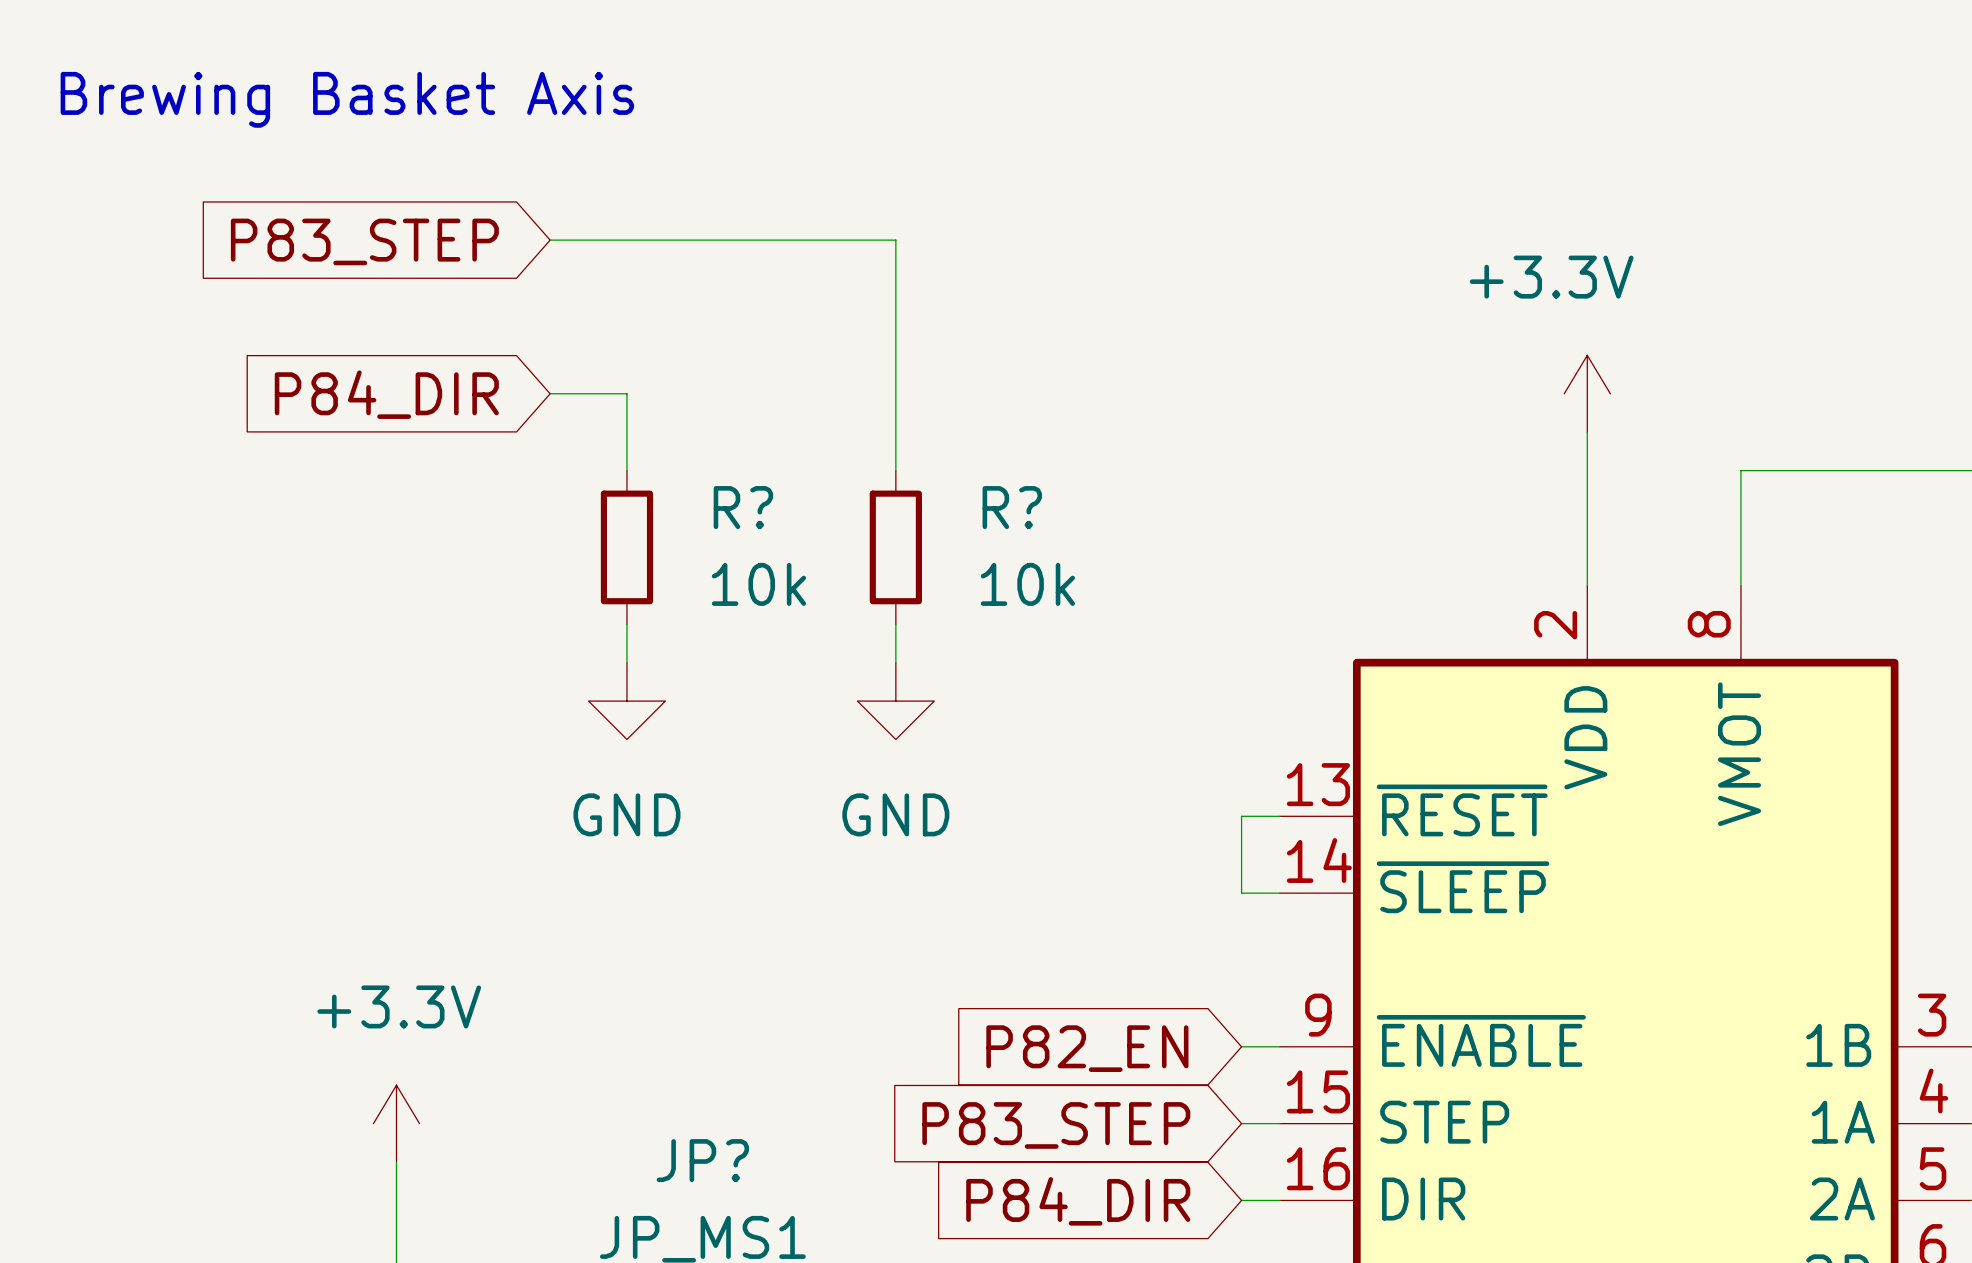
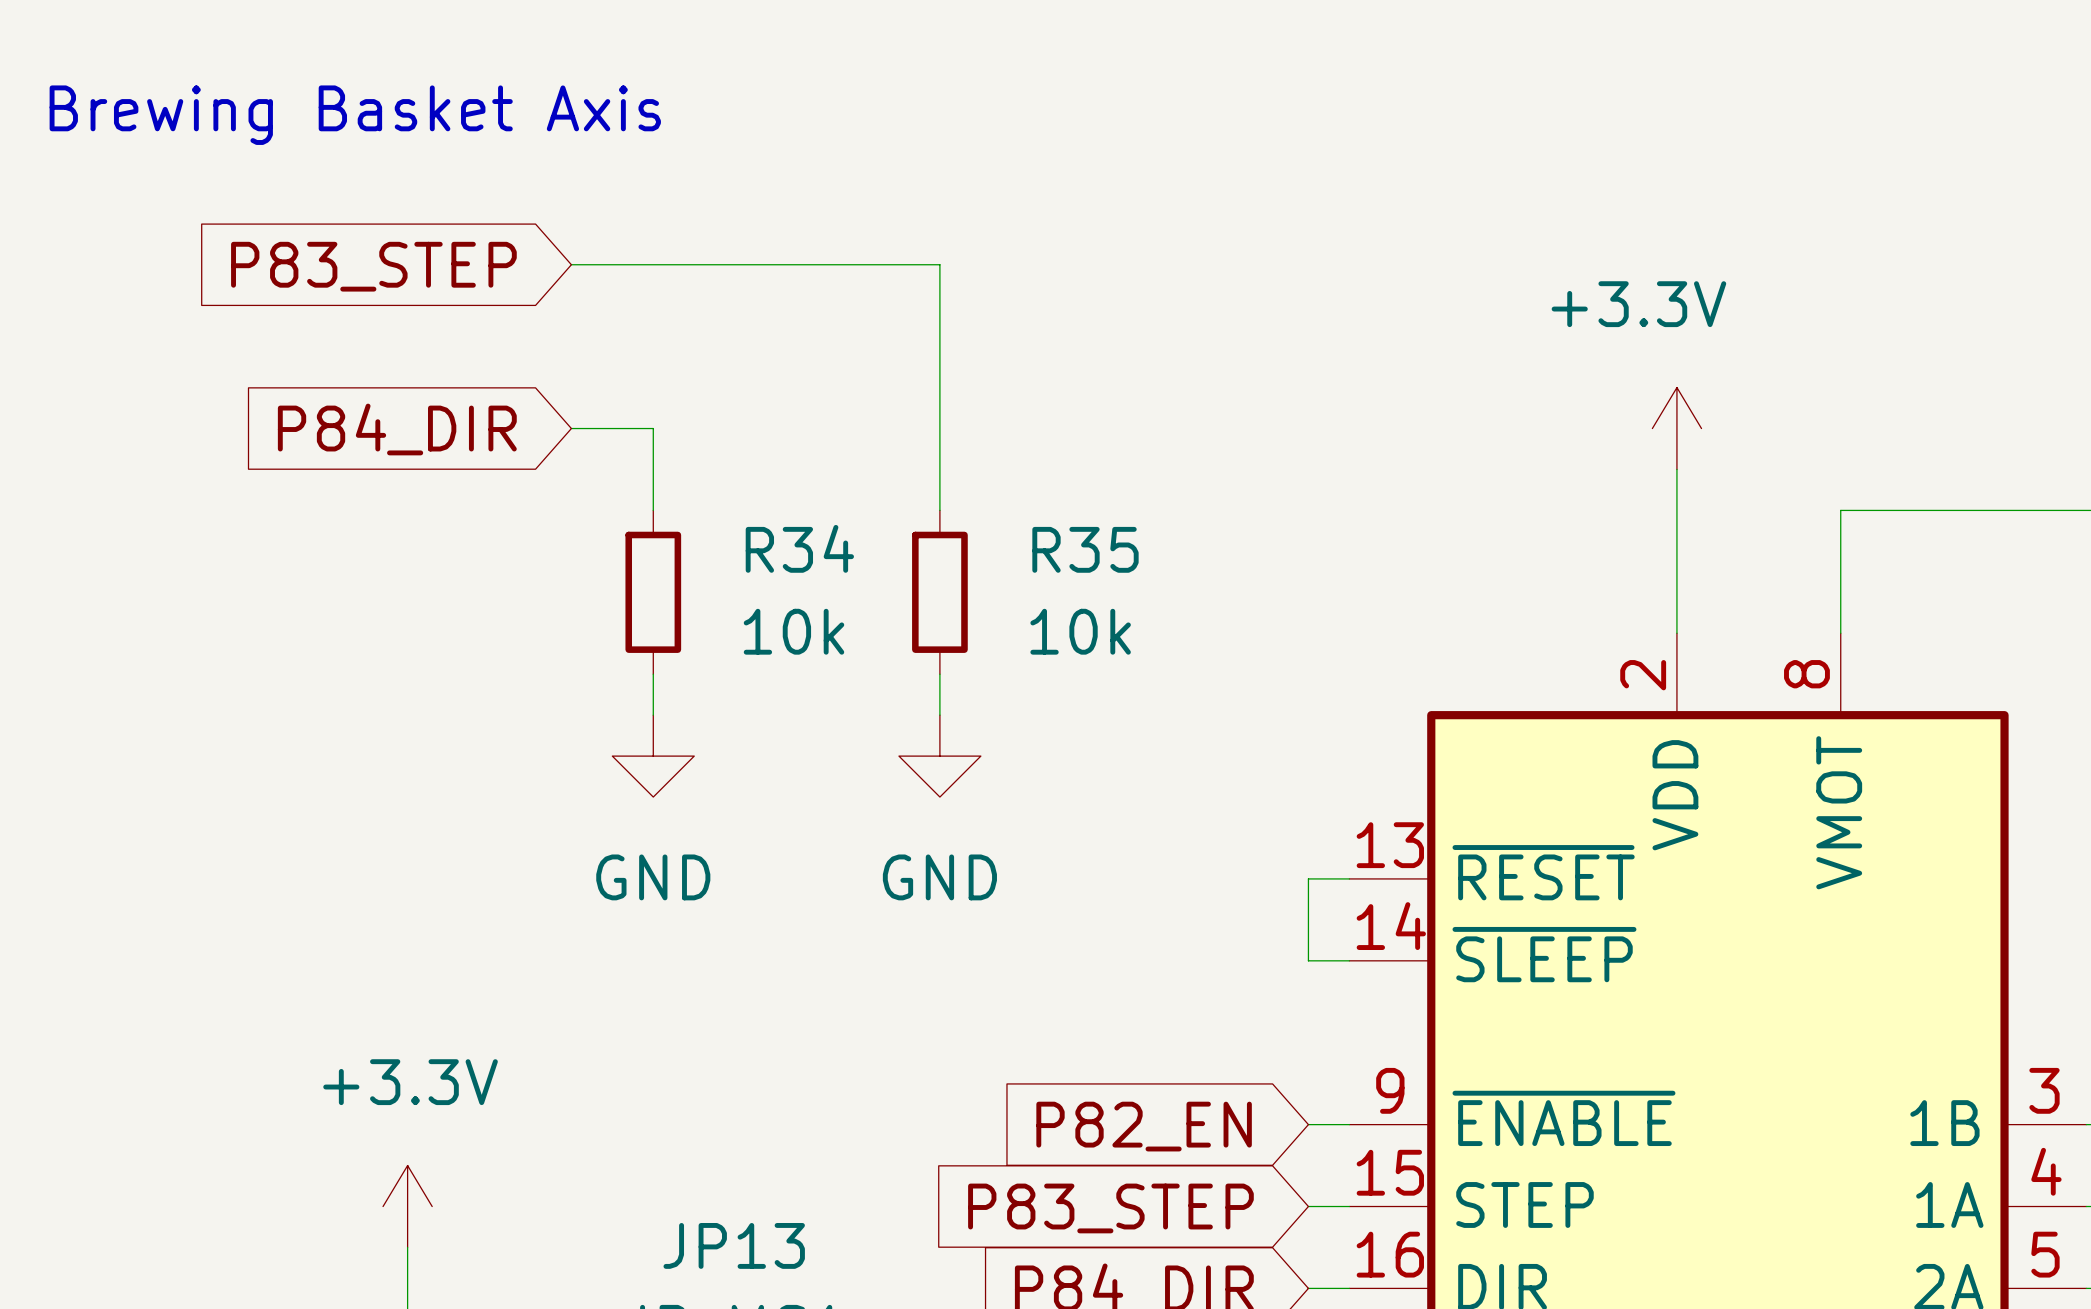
R? name: R? (743, 507) -> R34 (799, 548)
R? name: R? (1012, 507) -> R35 (1085, 549)
JP? name: JP? (702, 1160) -> JP13 (734, 1245)

